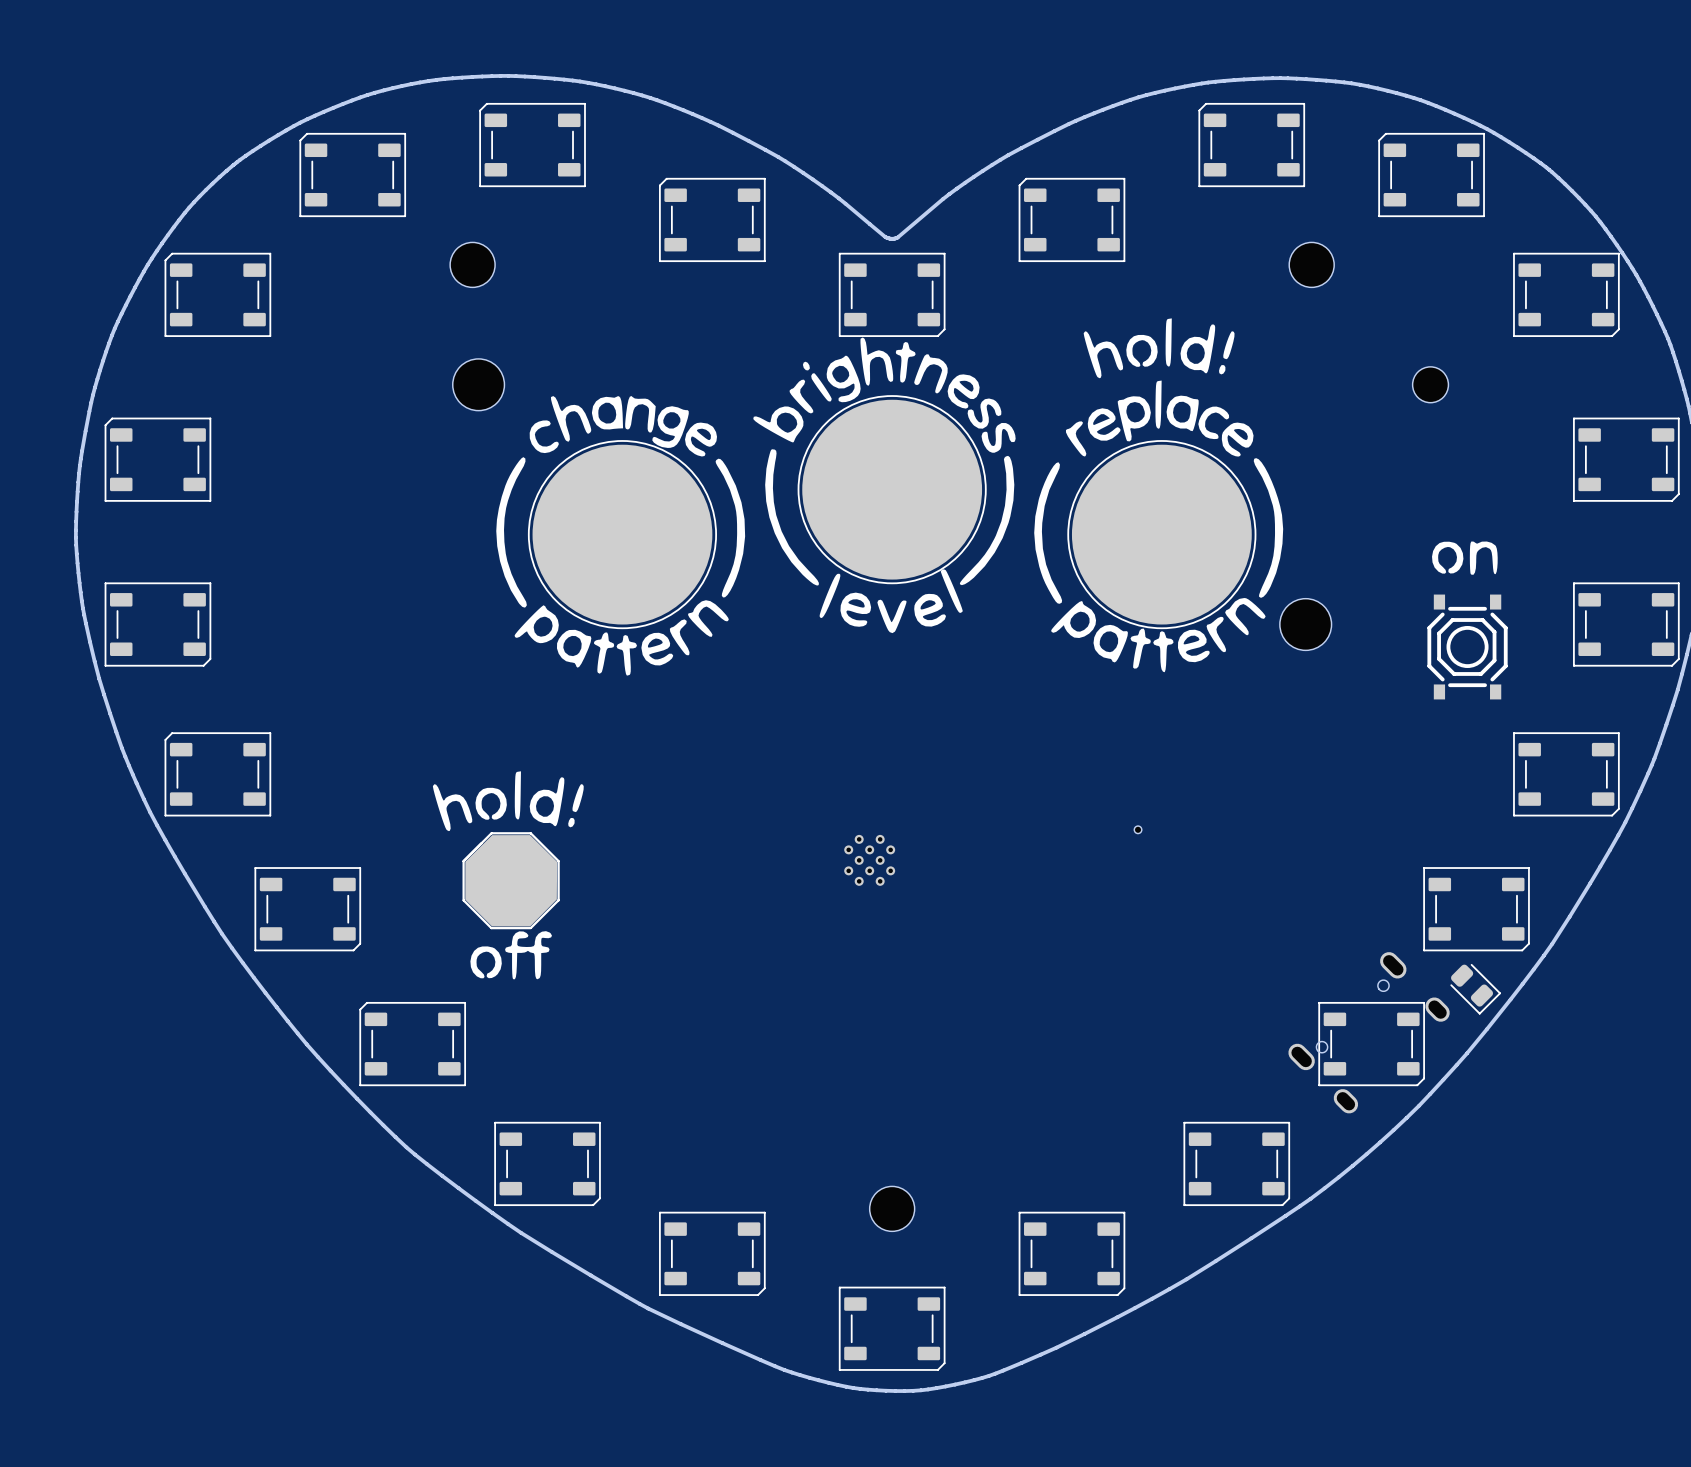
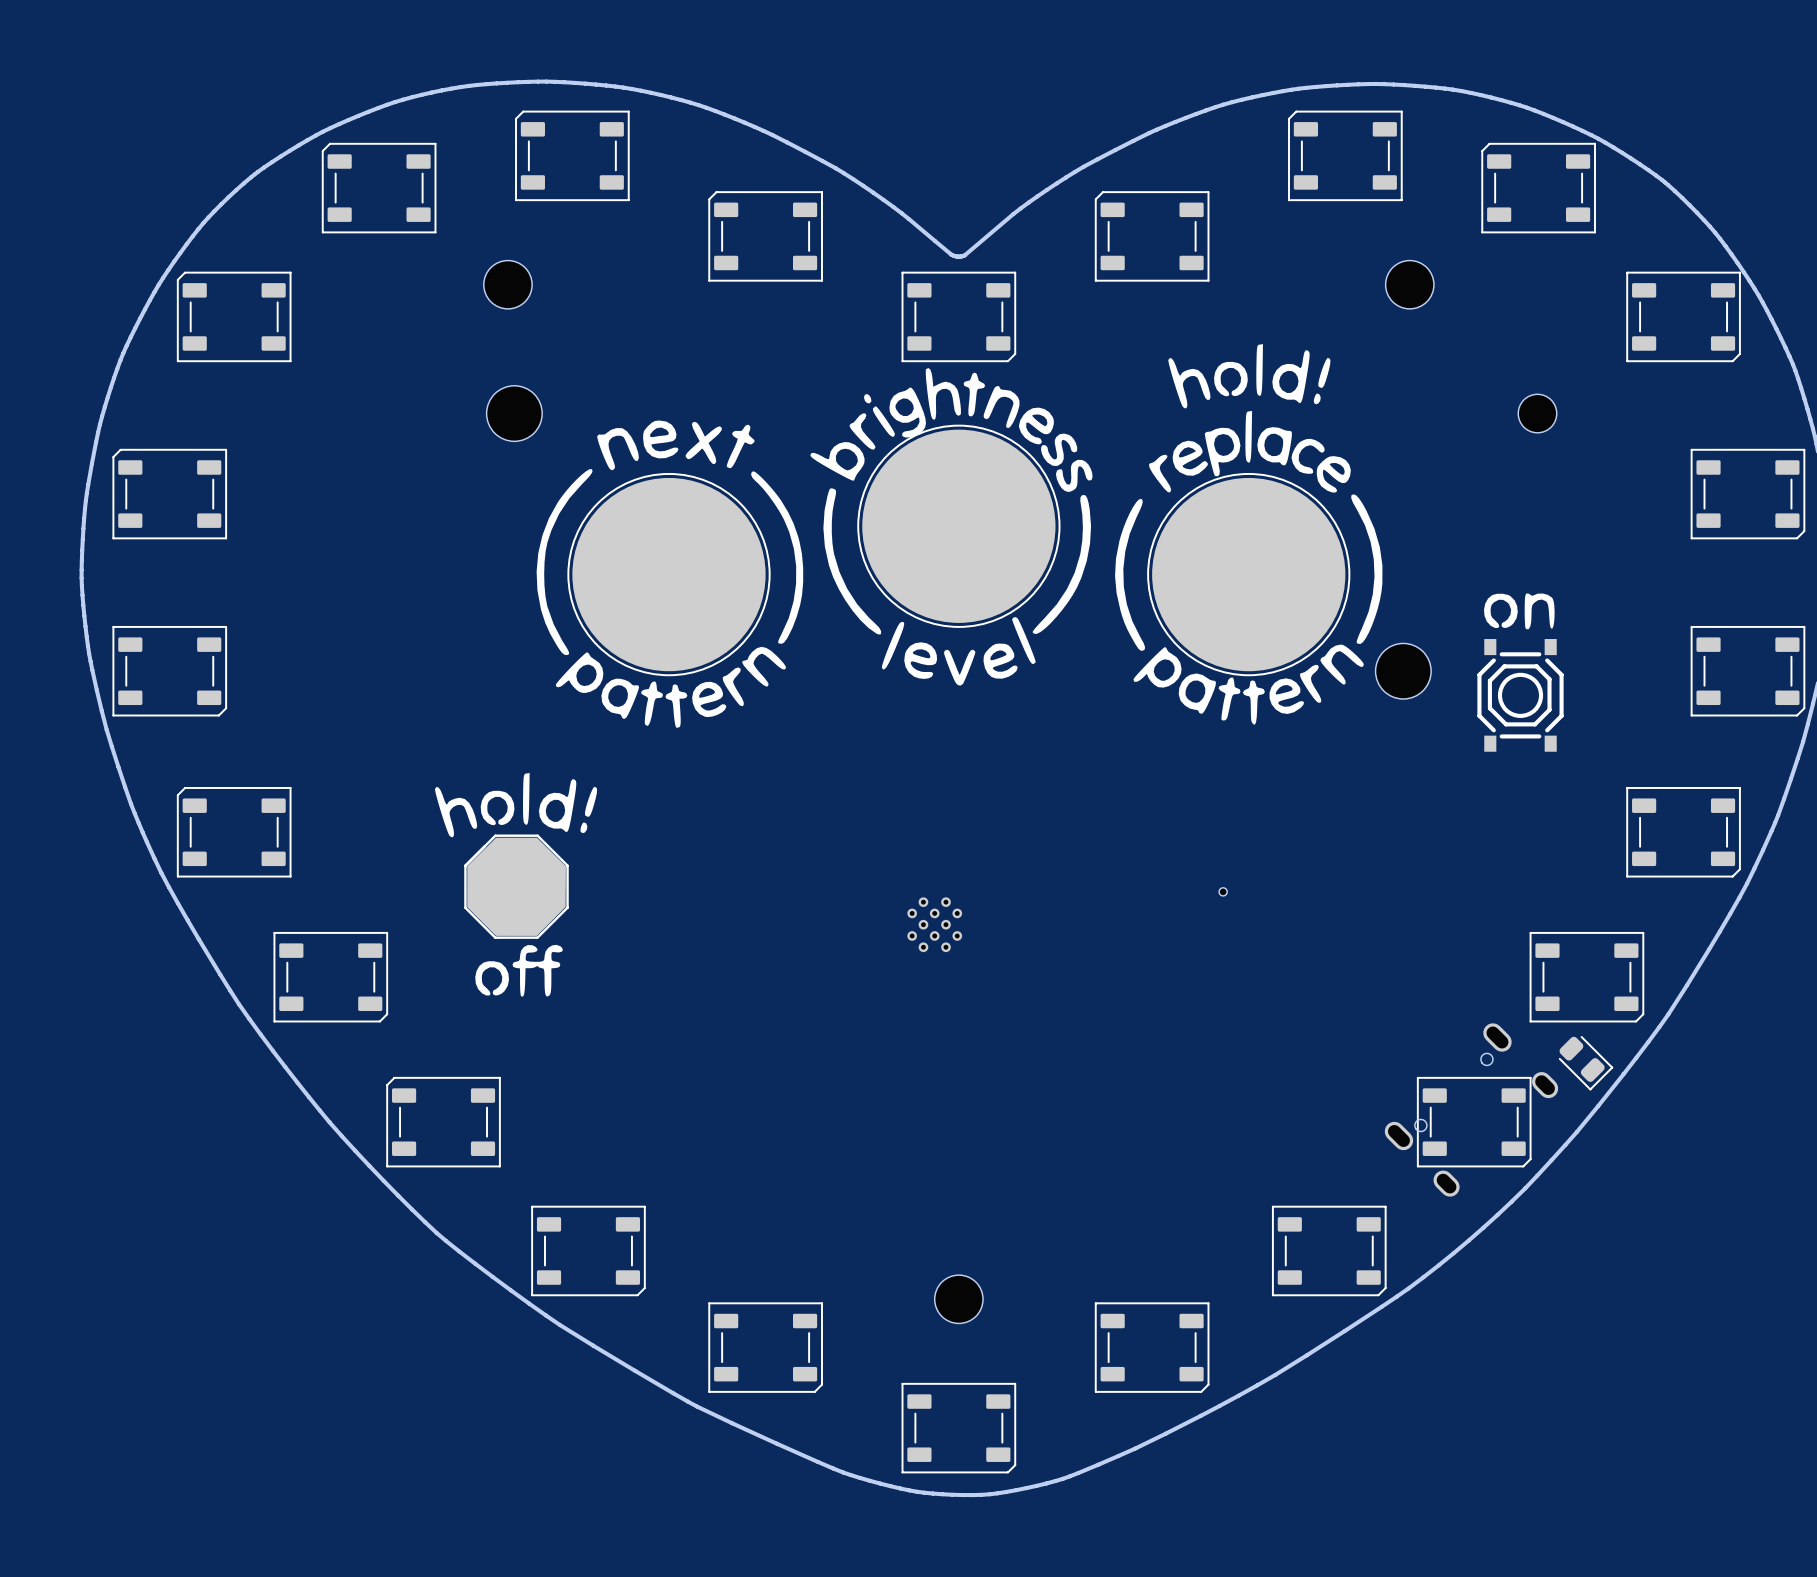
drawing: [432, 318, 1498, 980] -> none
drawing: none -> [1115, 344, 1383, 725]
drawing: none -> [536, 368, 1093, 728]
drawing: none -> [1484, 593, 1555, 630]
part position: (1467, 646) -> (1520, 695)
drawing: none -> [435, 773, 598, 997]
part position: (511, 880) -> (516, 886)

